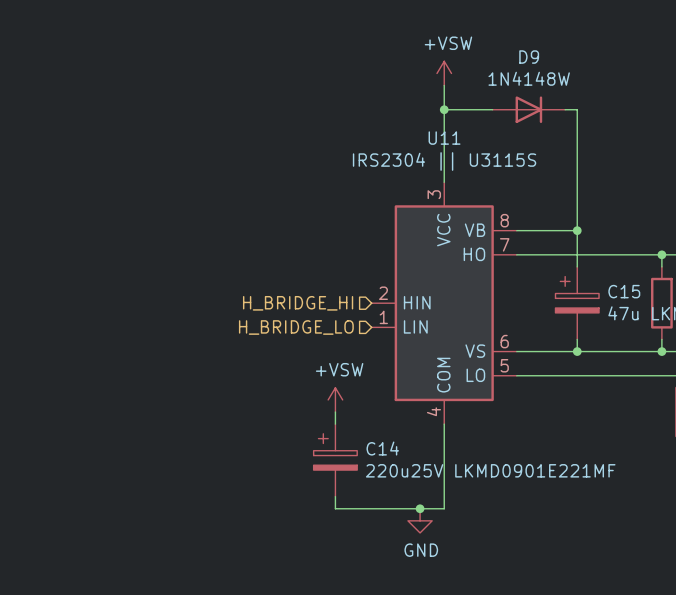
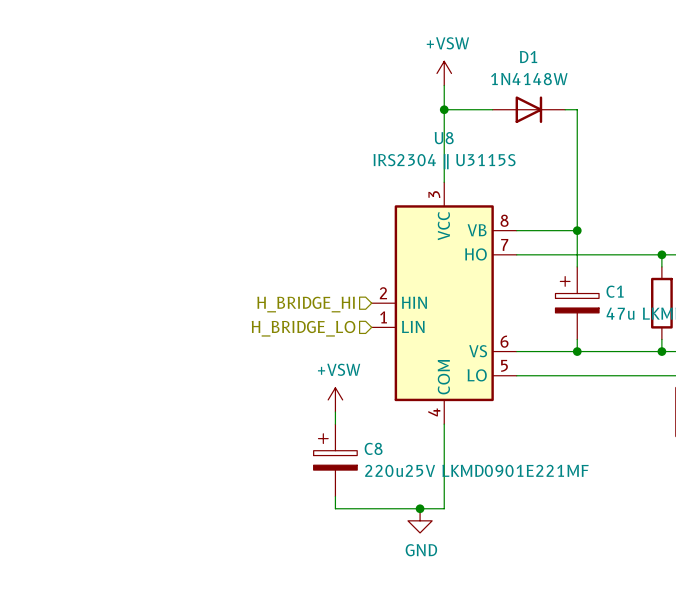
D9 name: D9 (529, 57) -> D1 (528, 57)
U11 name: U11 (444, 138) -> U8 (444, 138)
C15 name: C15 (624, 291) -> C1 (615, 291)
C14 name: C14 (382, 448) -> C8 (373, 448)

